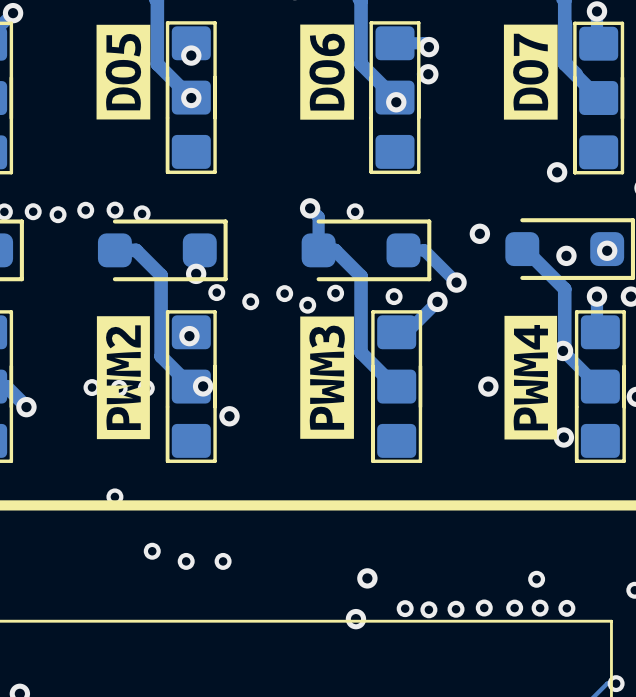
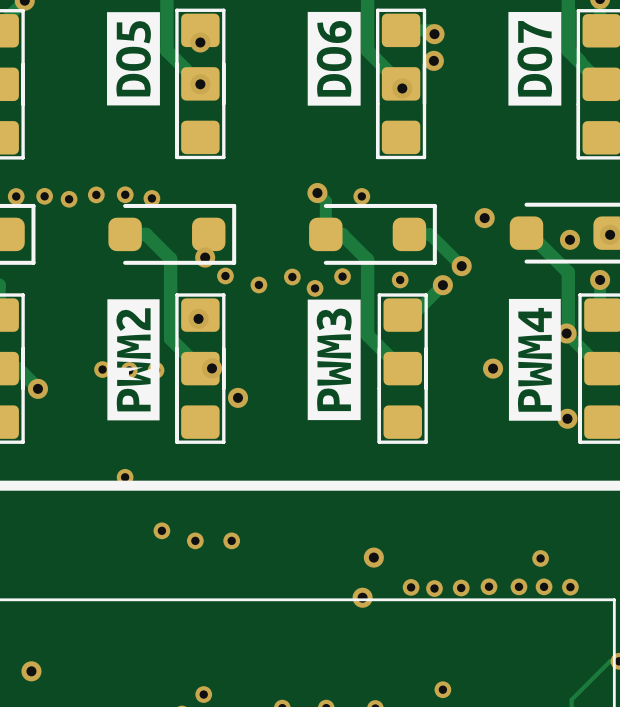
via: (557, 172) -> none

